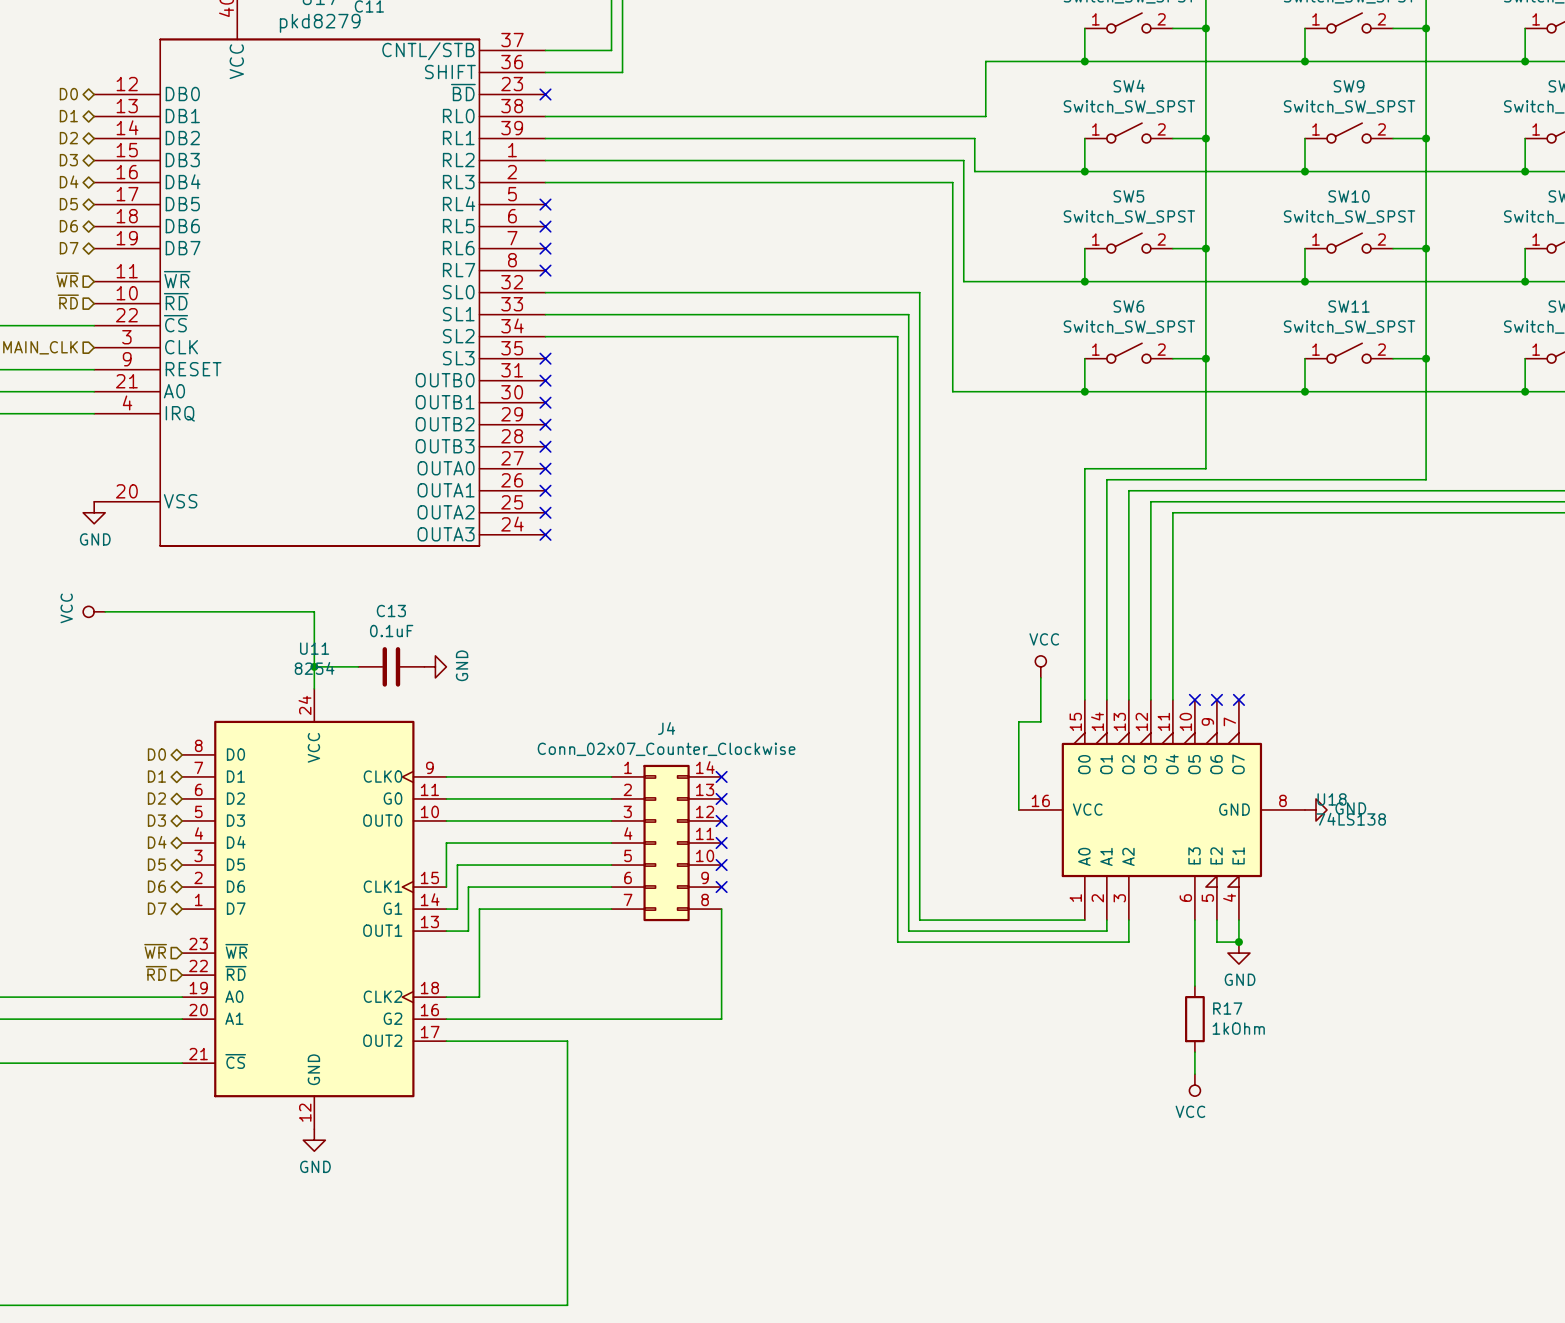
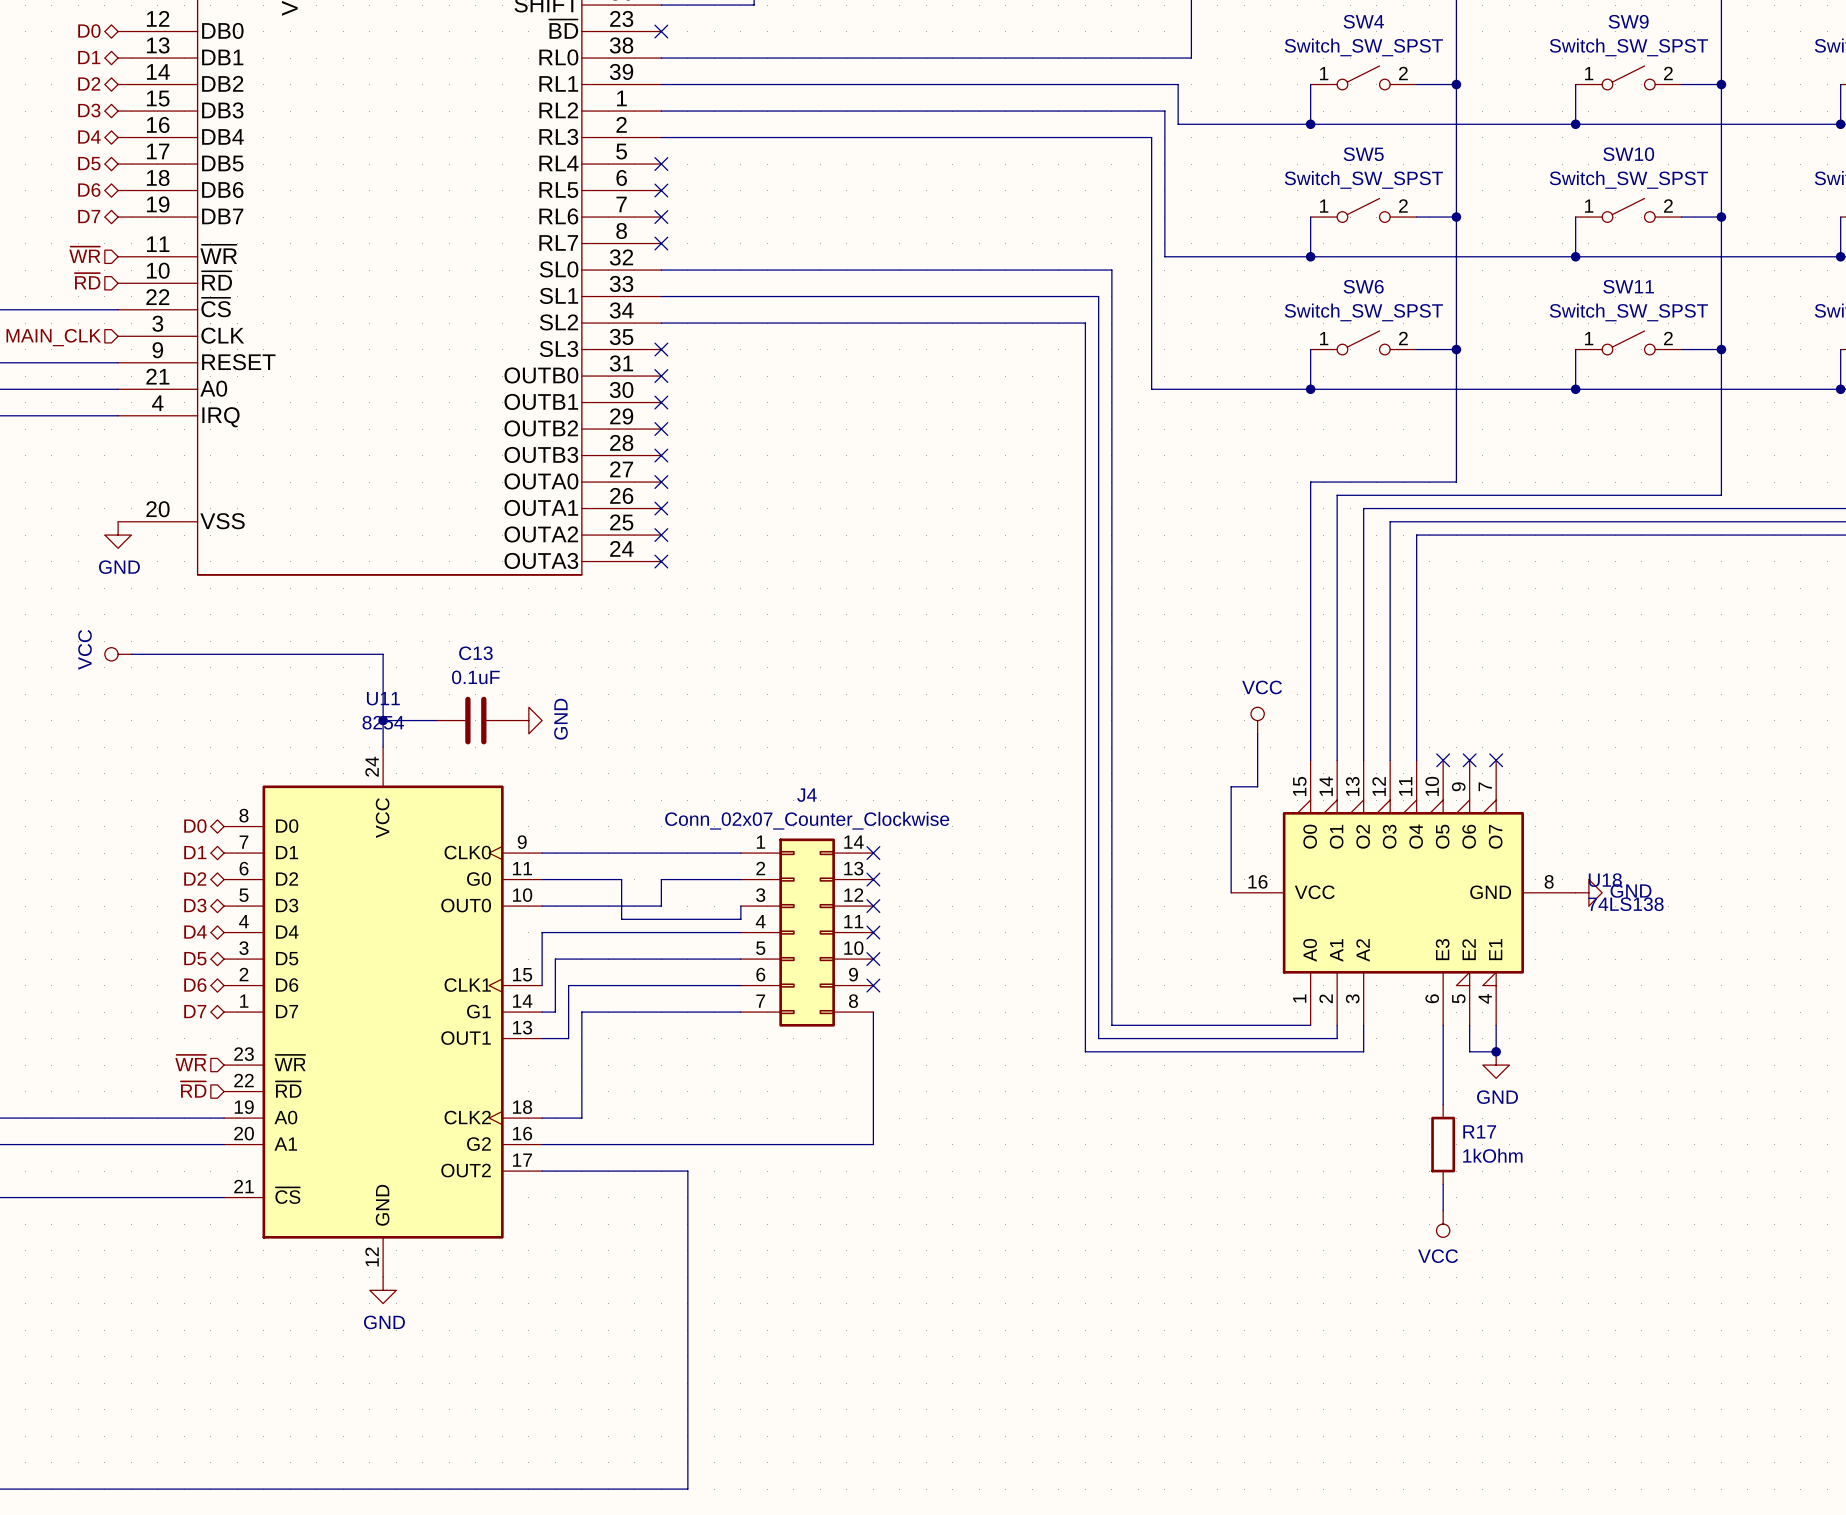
wire: (512, 798) (545, 798) -> (661, 906) (661, 879)
wire: (545, 820) (611, 820) -> (621, 879) (621, 919) (740, 919) (740, 906)

